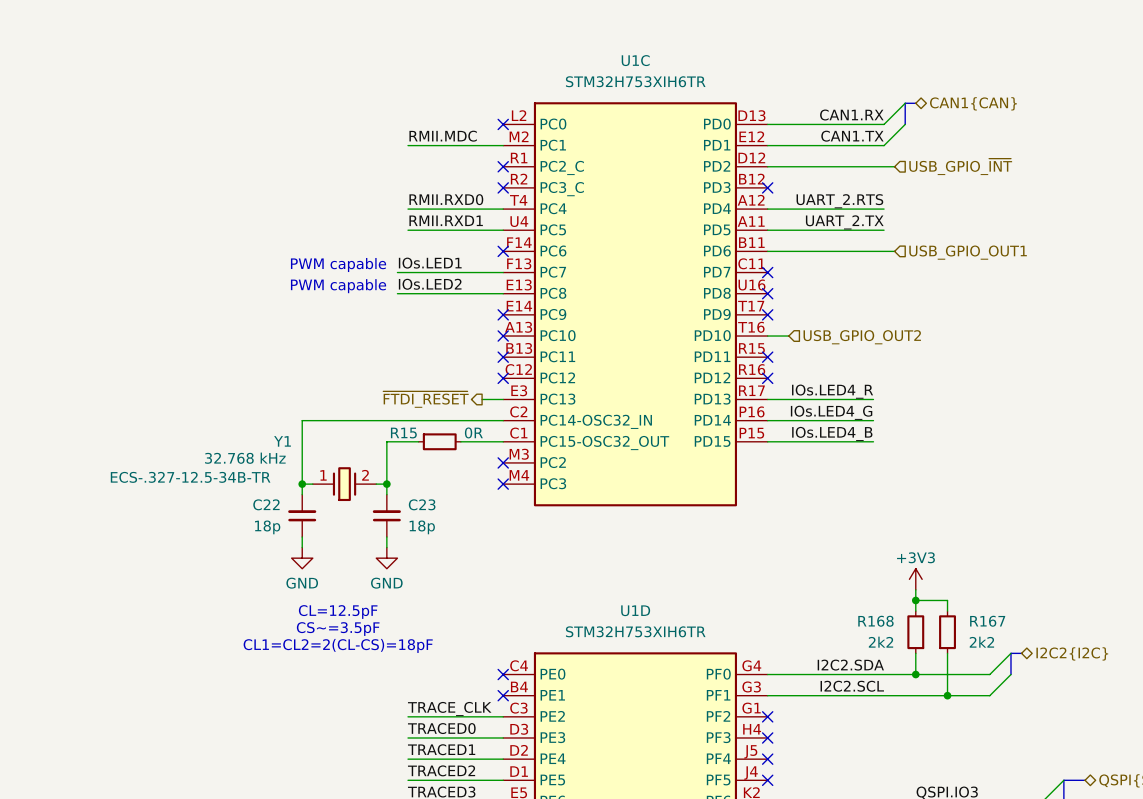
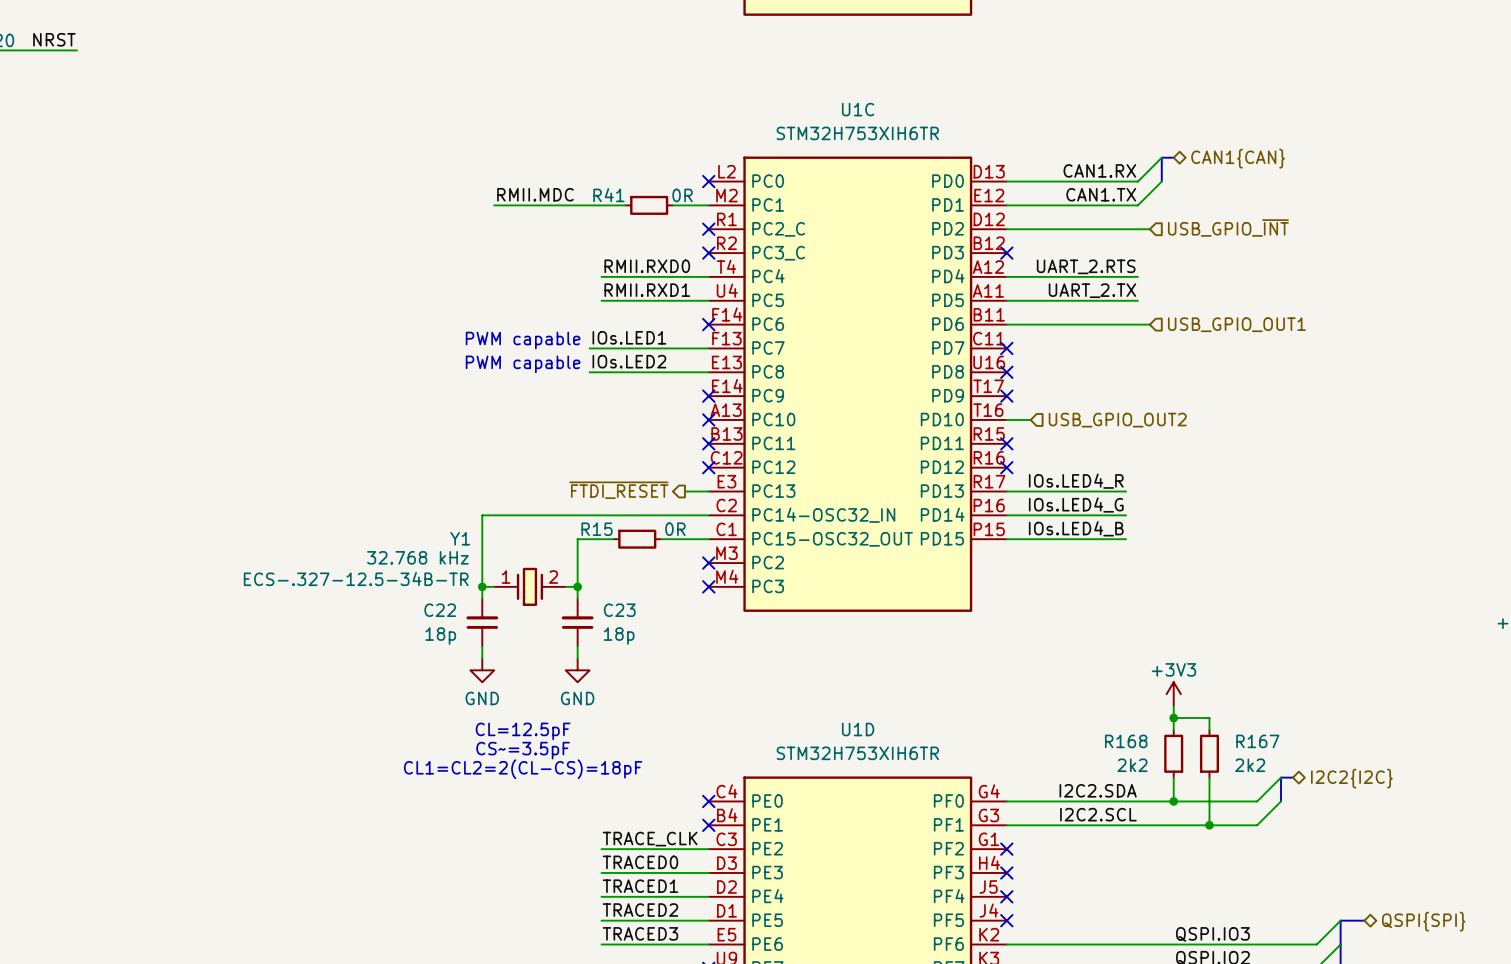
label position: RMII.MDC (443, 136) -> RMII.MDC (535, 194)
wire: none -> (494, 205) (601, 205)
wire: (429, 145) (471, 145) -> none
R41: none -> (649, 205)

